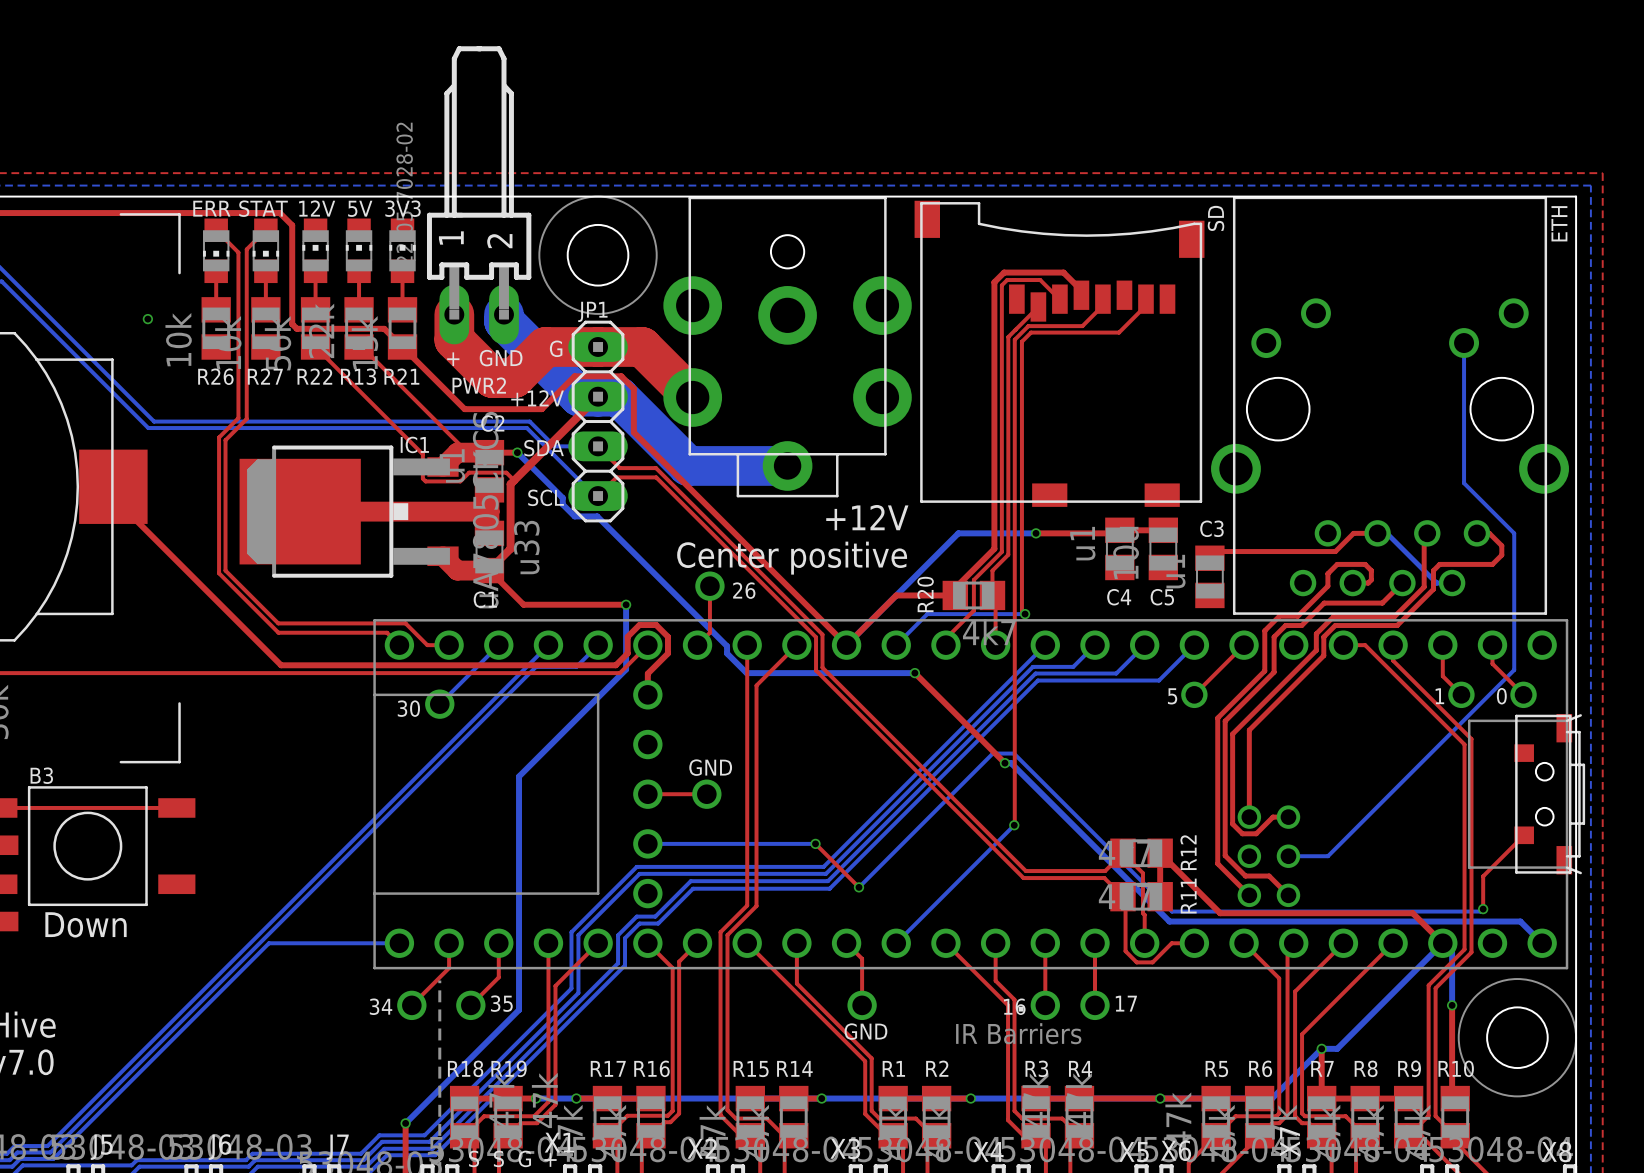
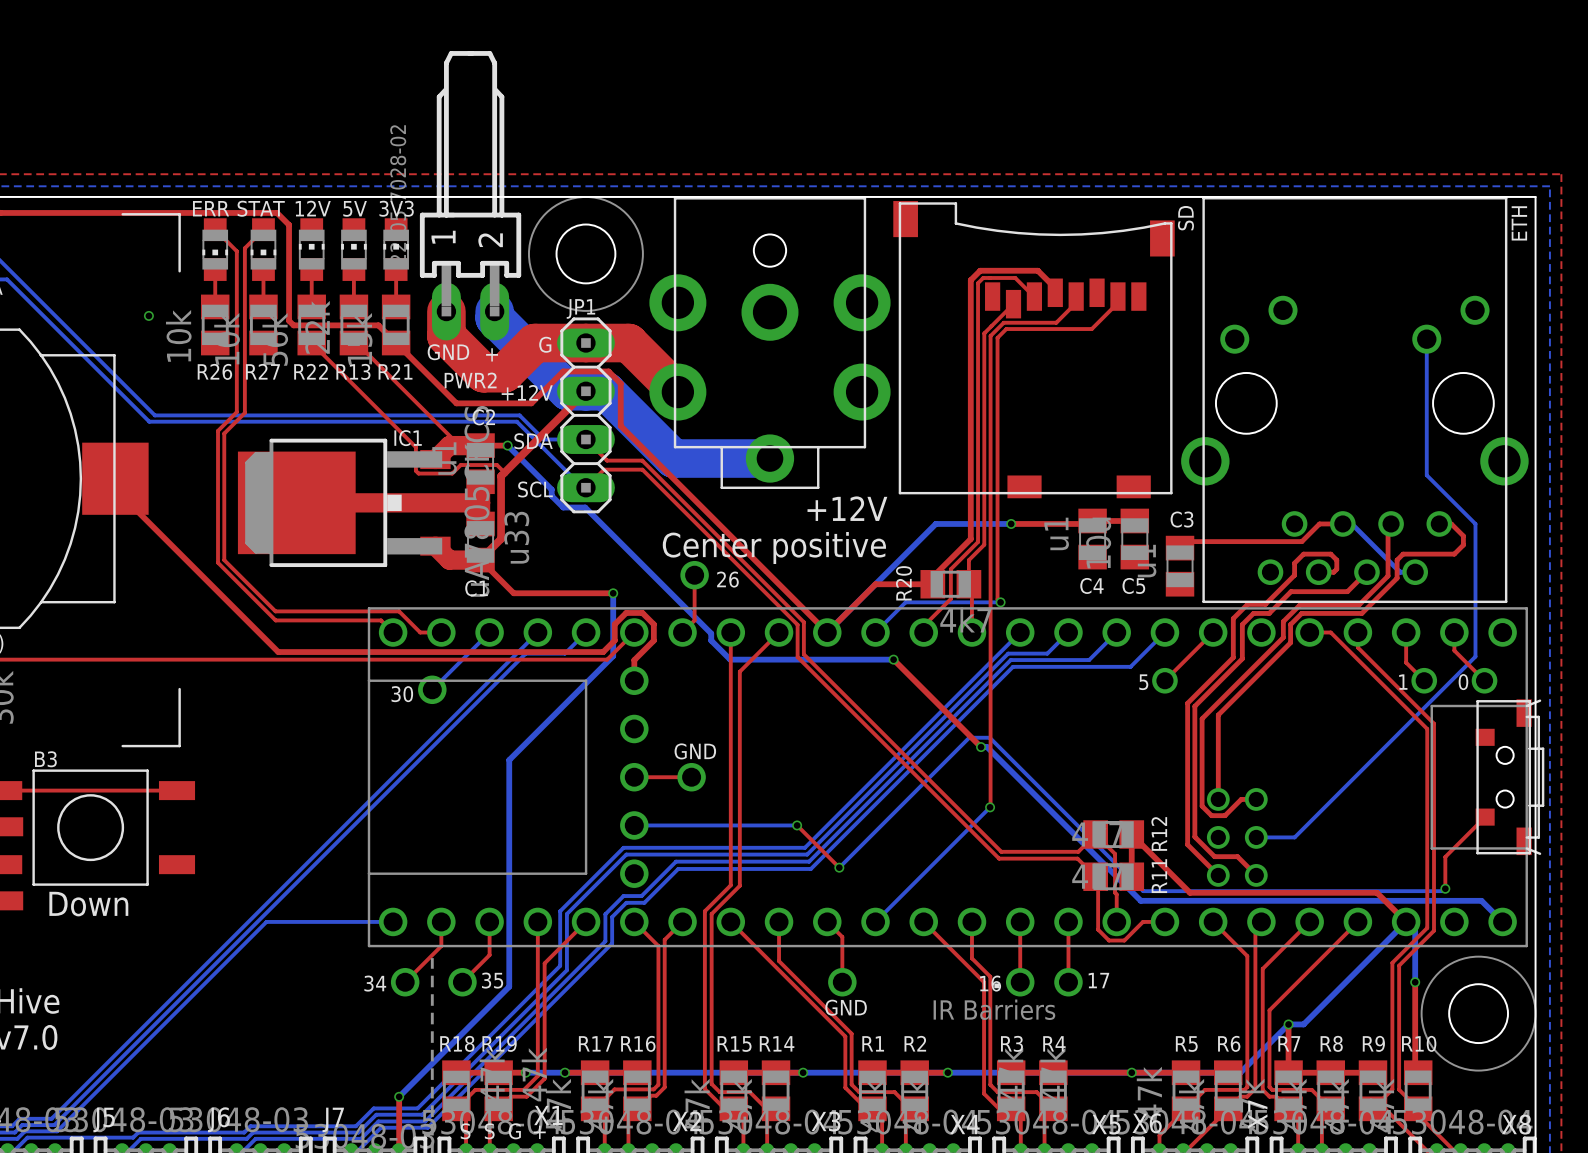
text position: GND (501, 358) -> GND (448, 352)
text position: + (453, 359) -> + (492, 354)

